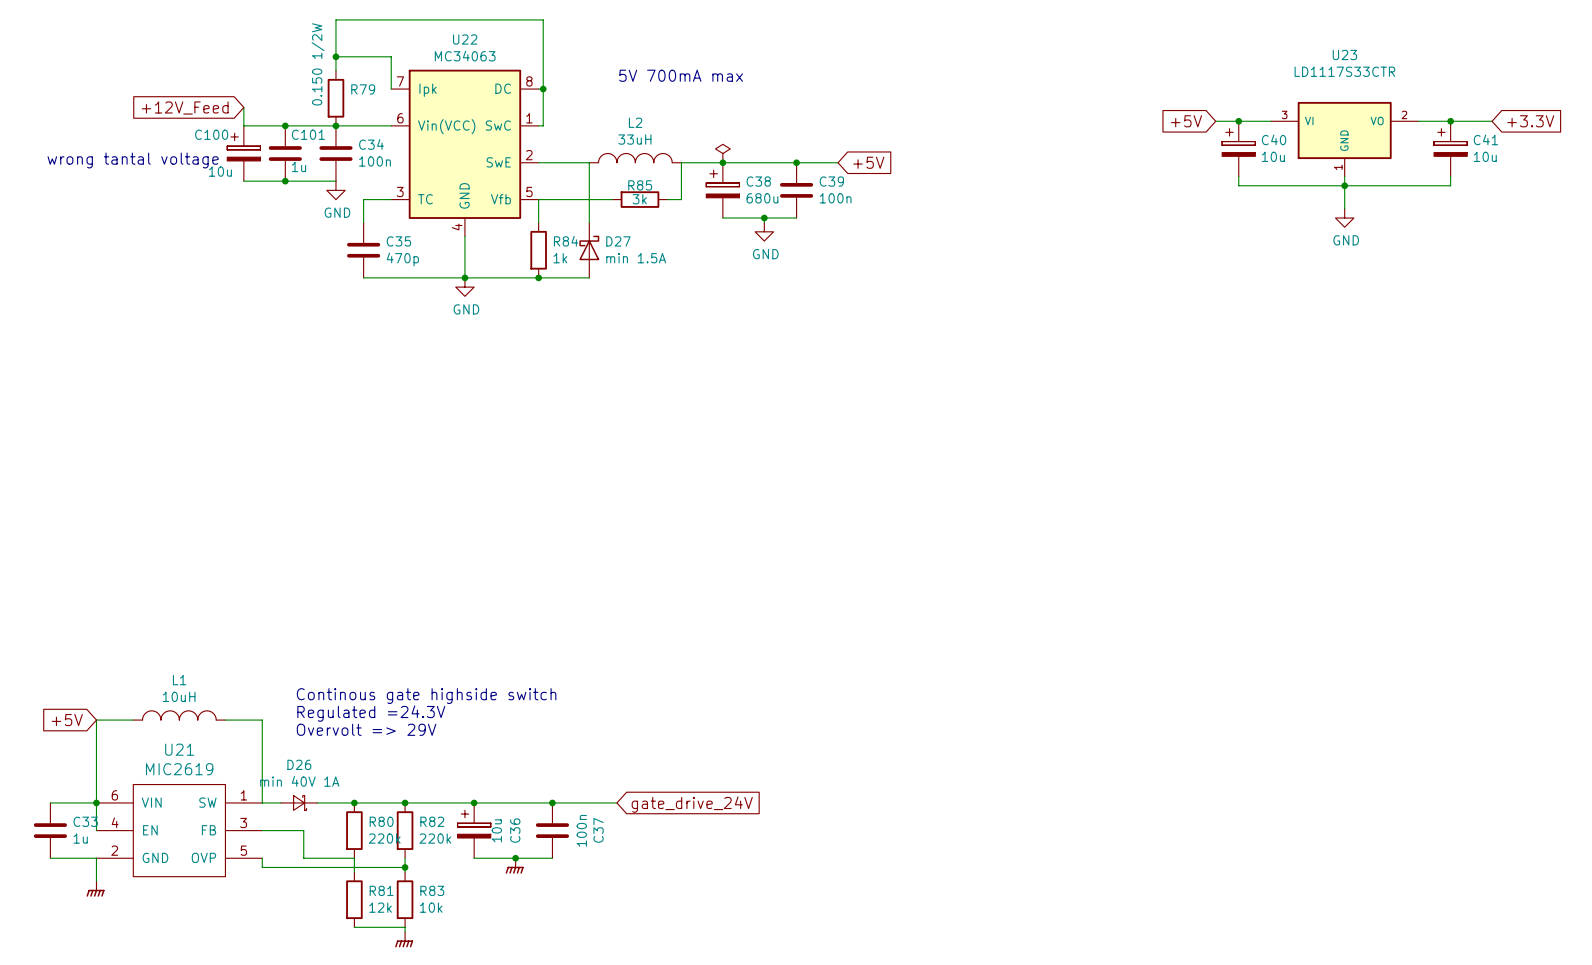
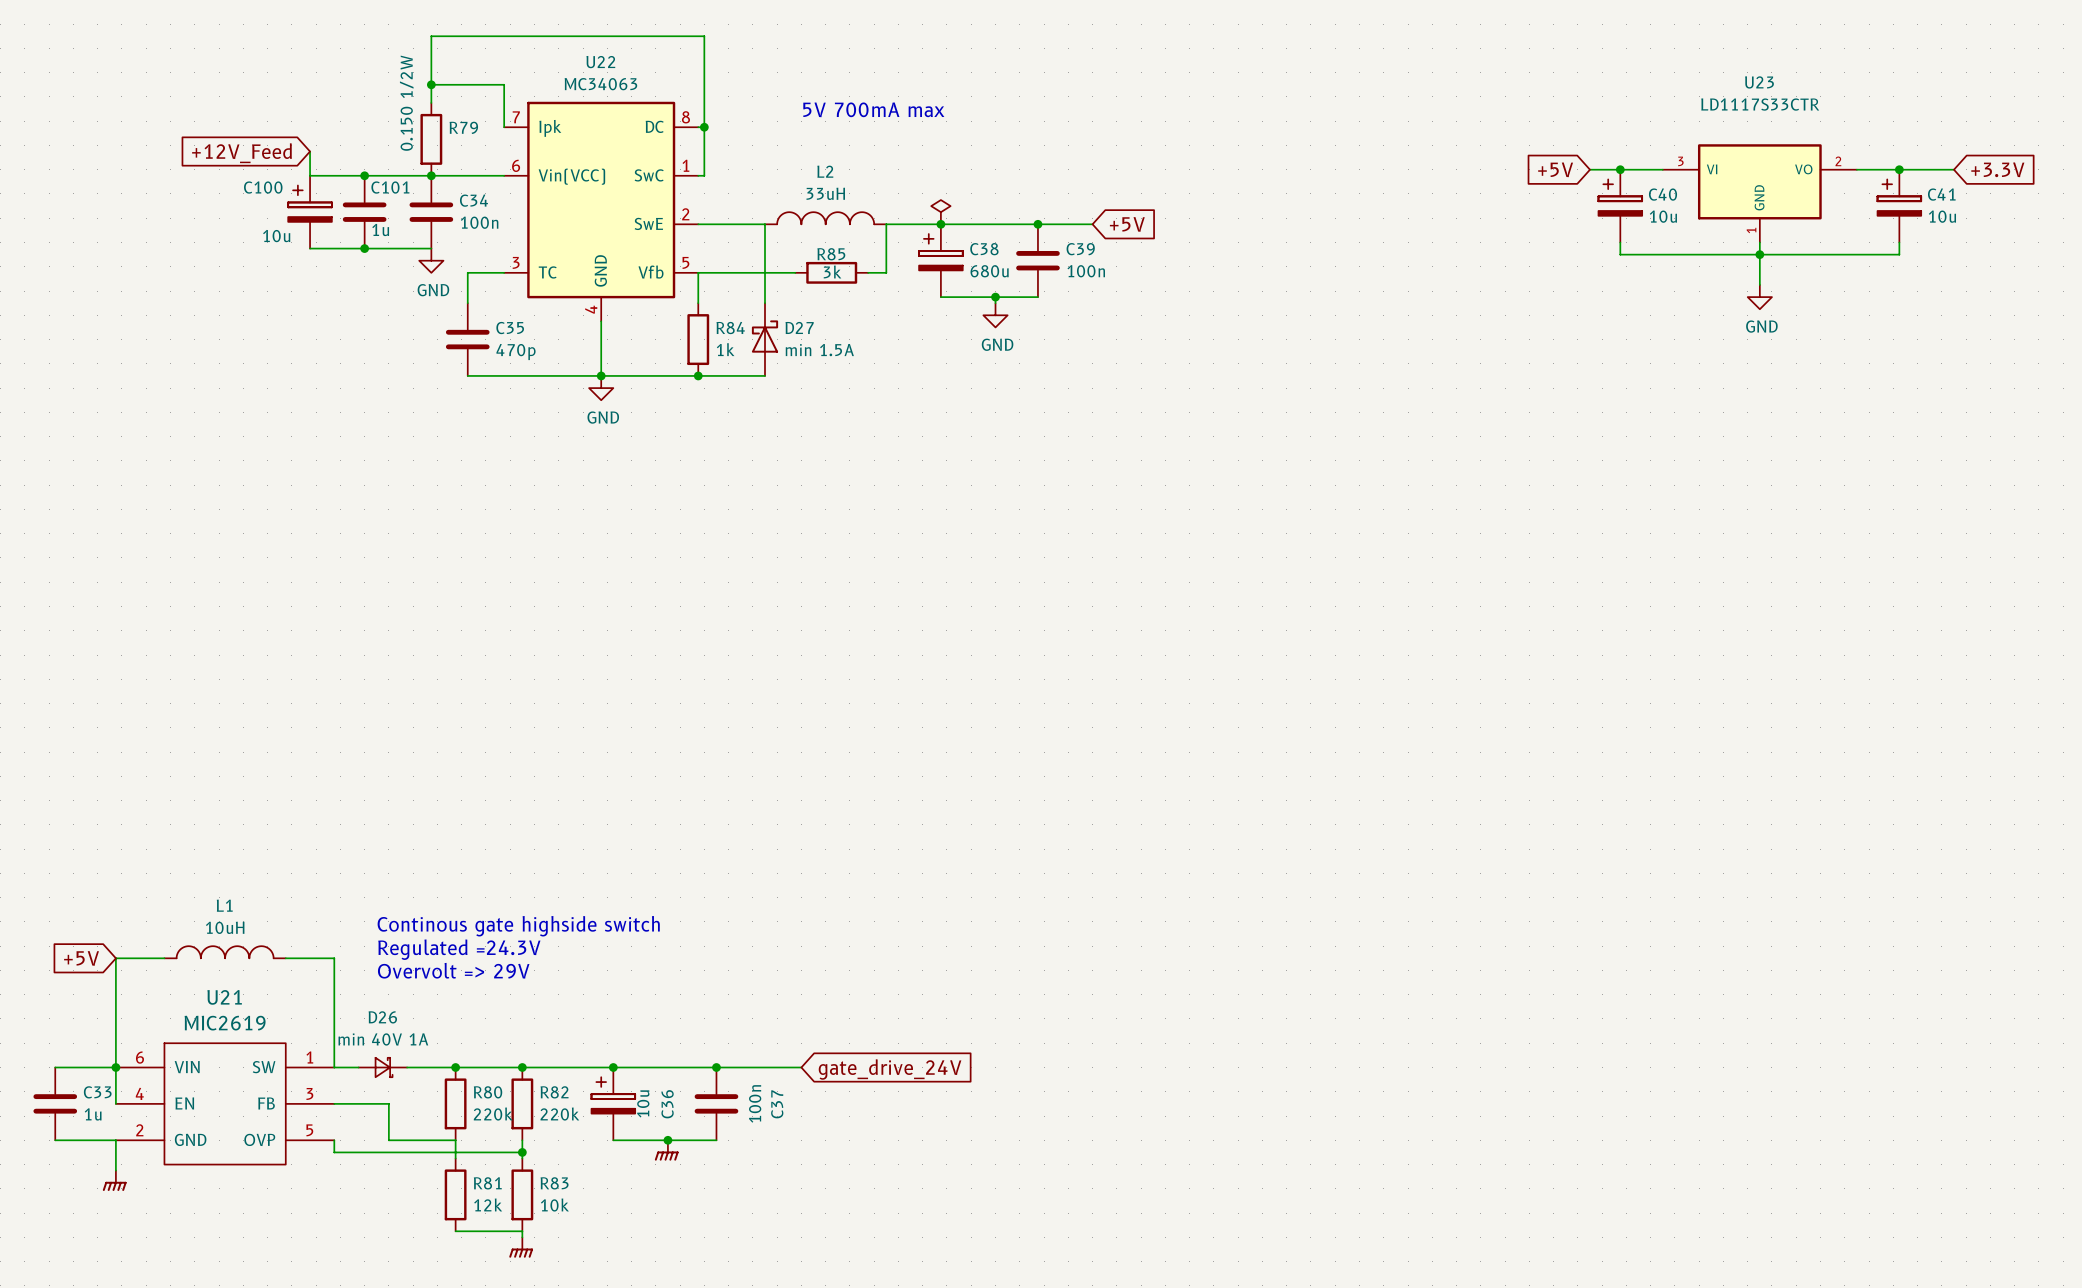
text: wrong tantal voltage (133, 160) -> none

